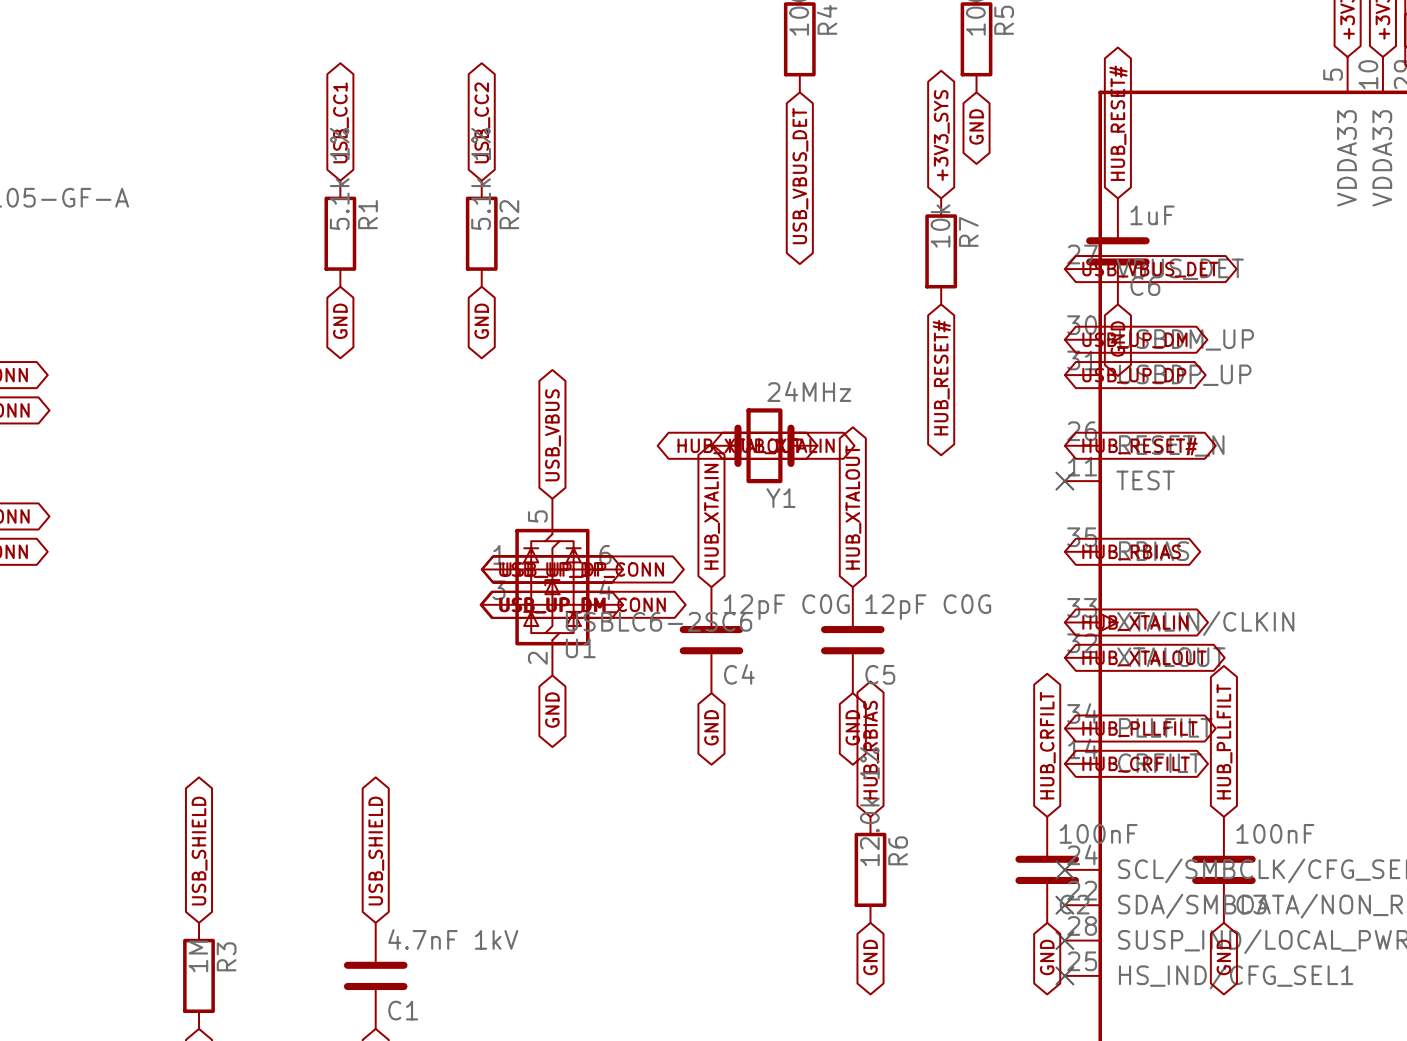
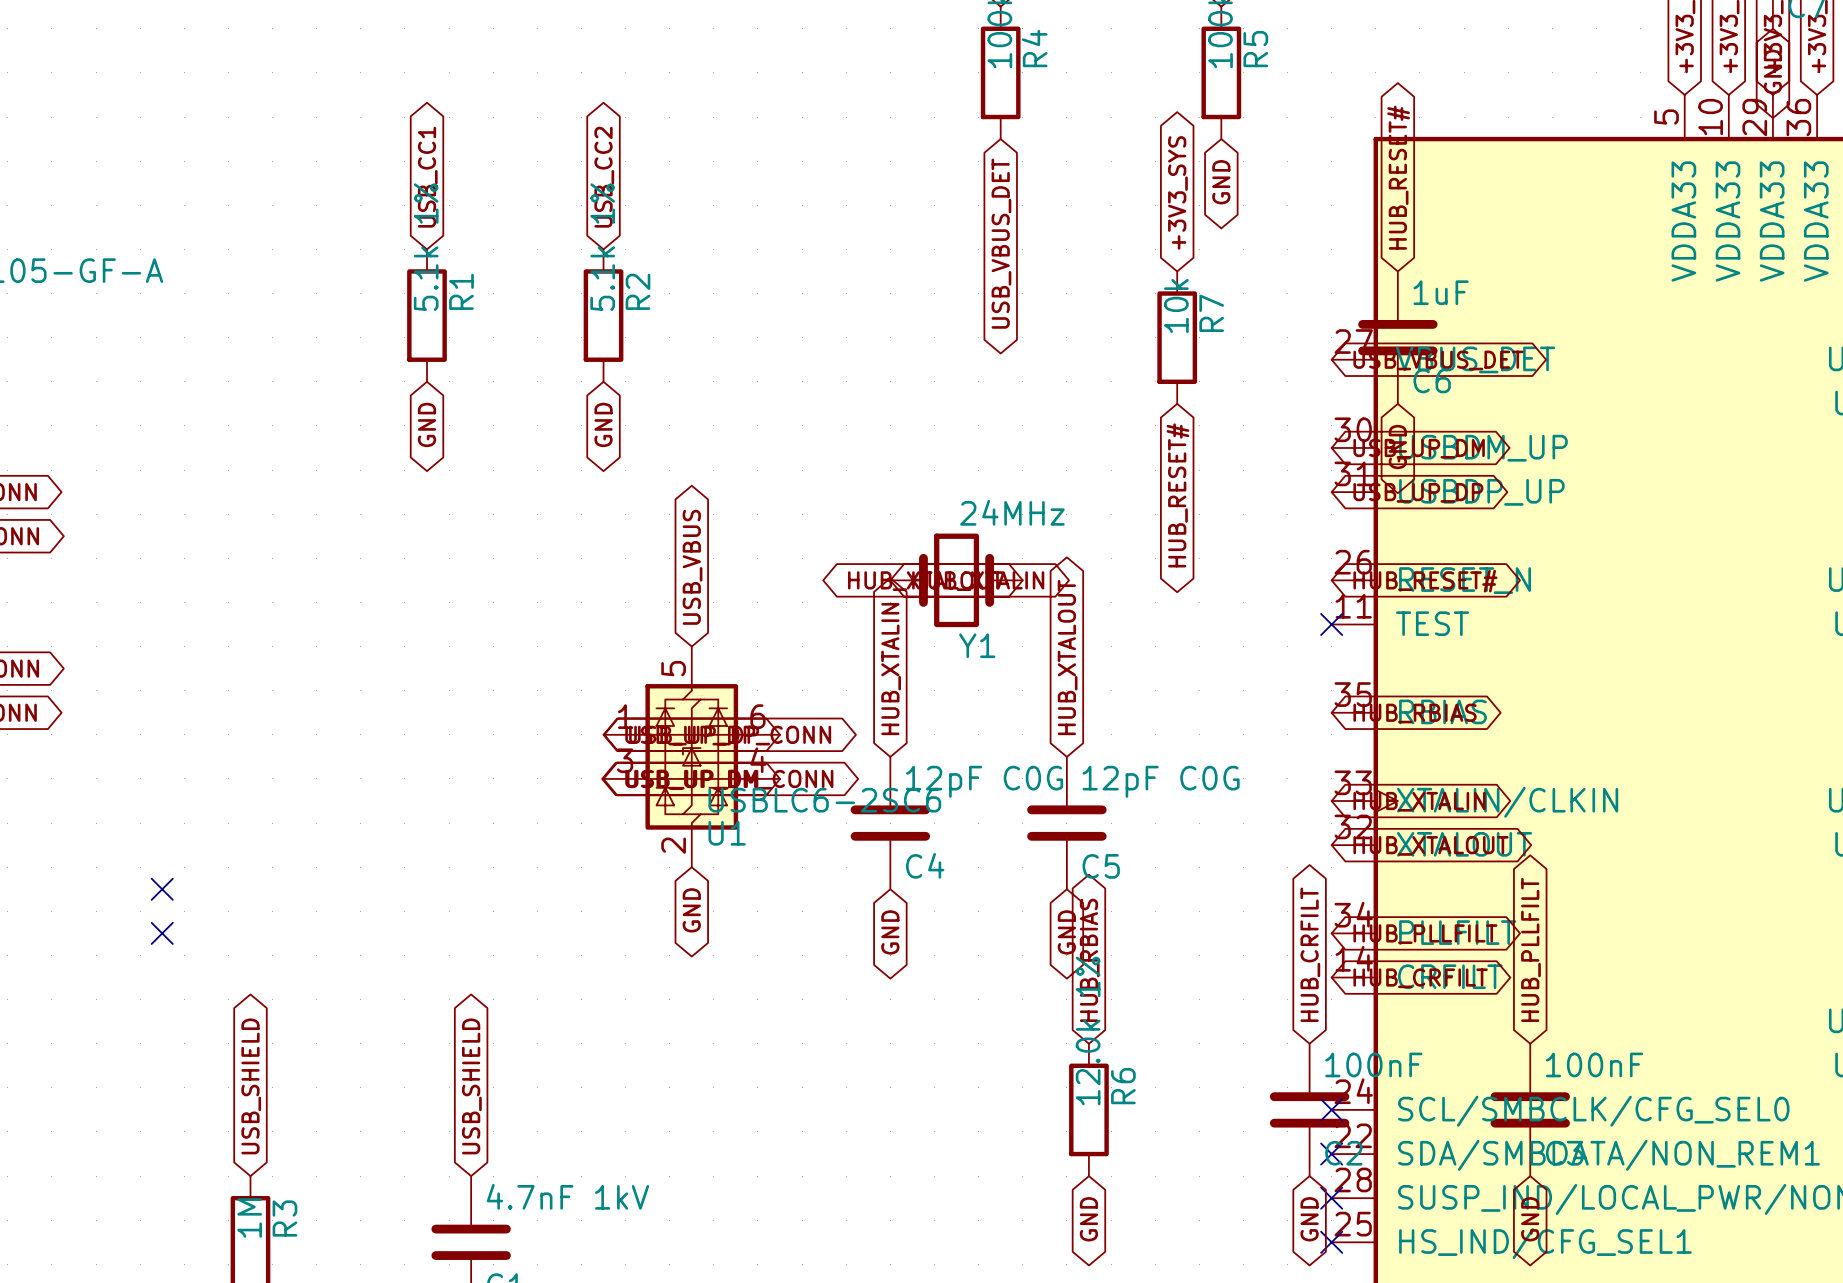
no-connect mark: none -> (162, 889)
no-connect mark: none -> (162, 933)

